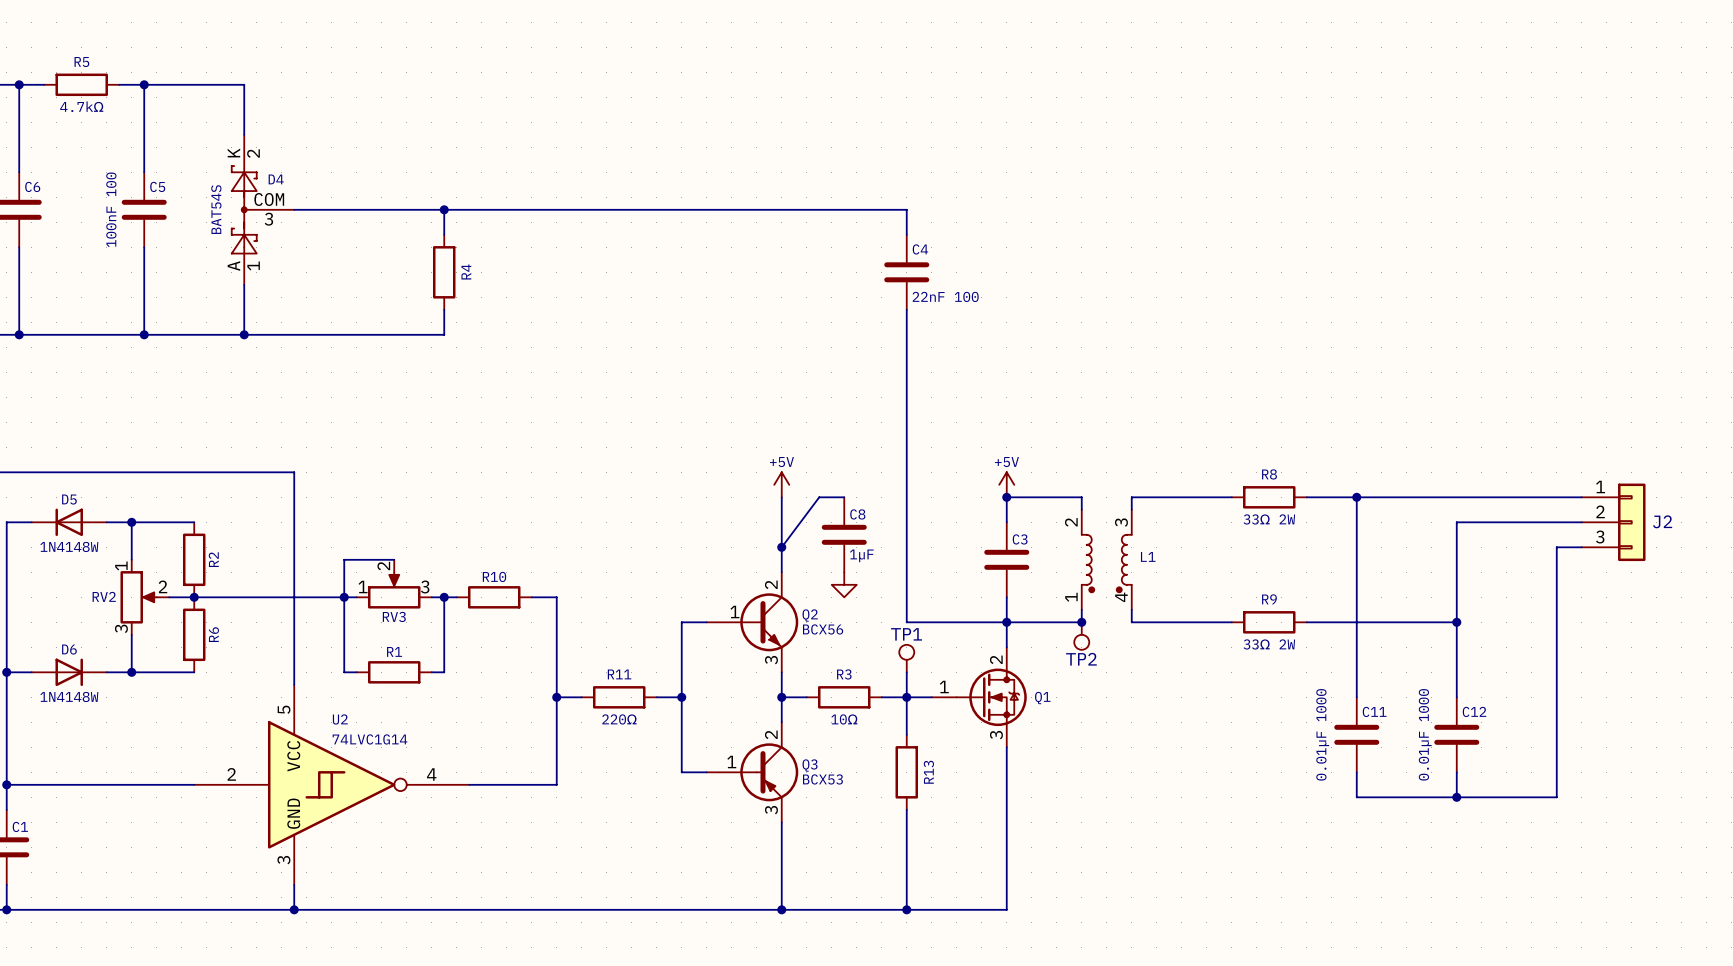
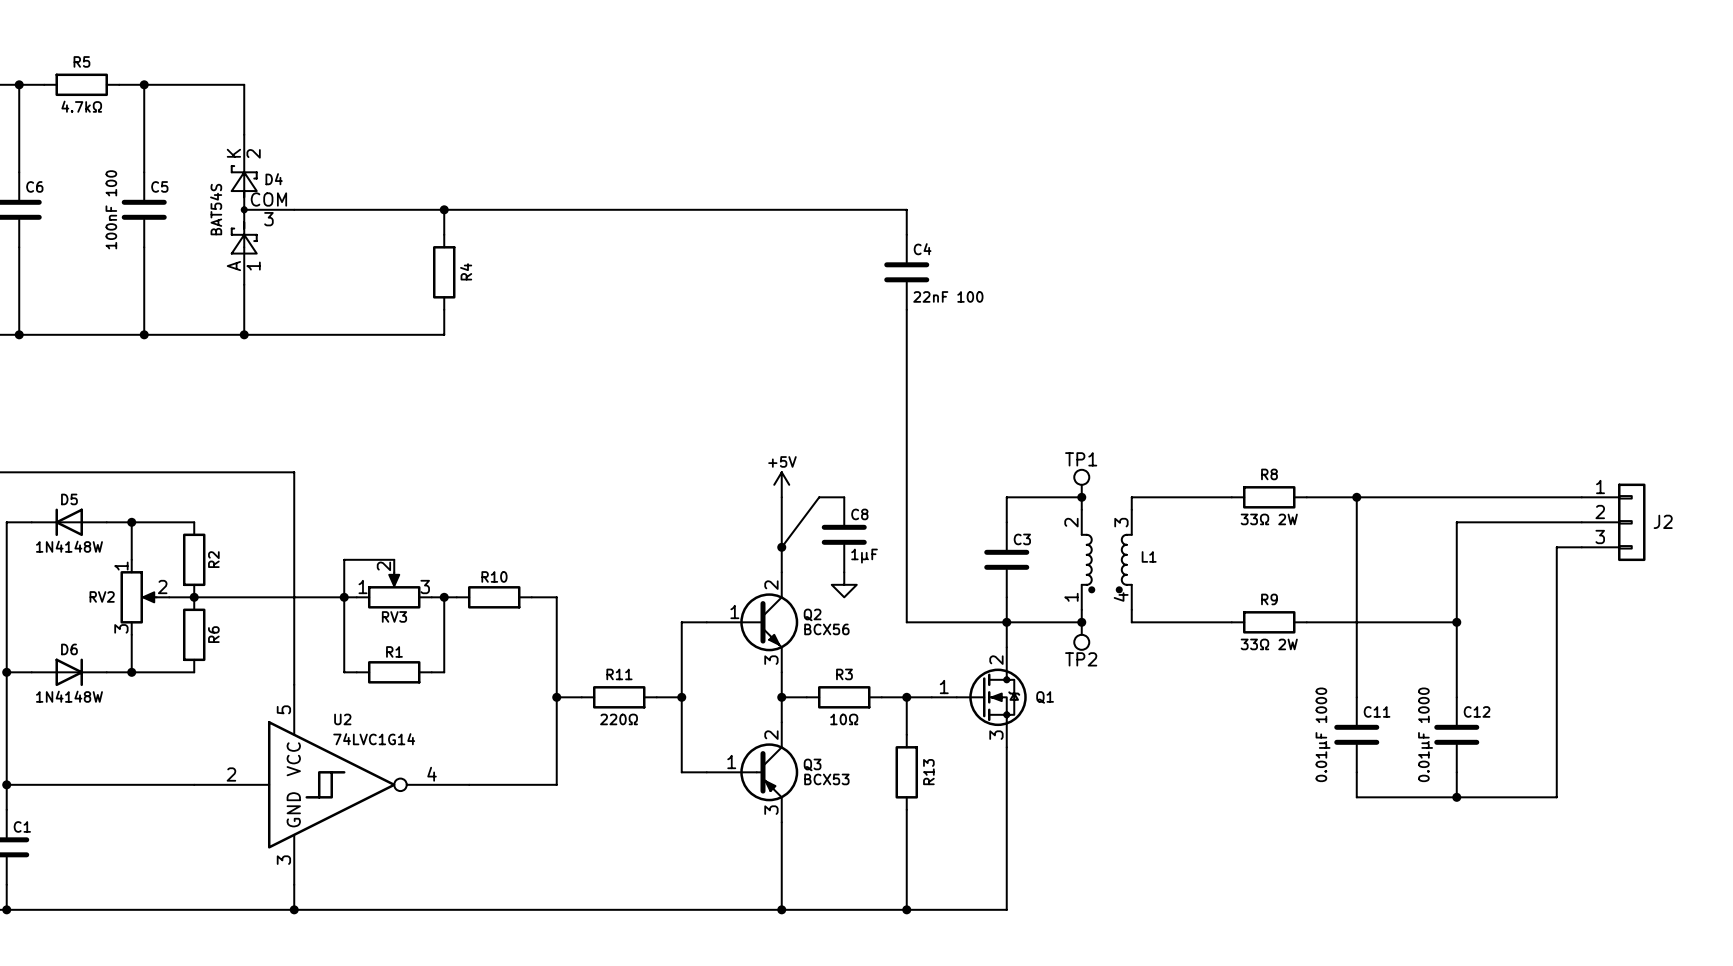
power symbol: +5V (1006, 484) -> none
junction: (1006, 497) -> none
junction: none -> (1081, 497)
TP1 position: (906, 658) -> (1081, 483)
wire: (906, 672) (906, 697) -> none

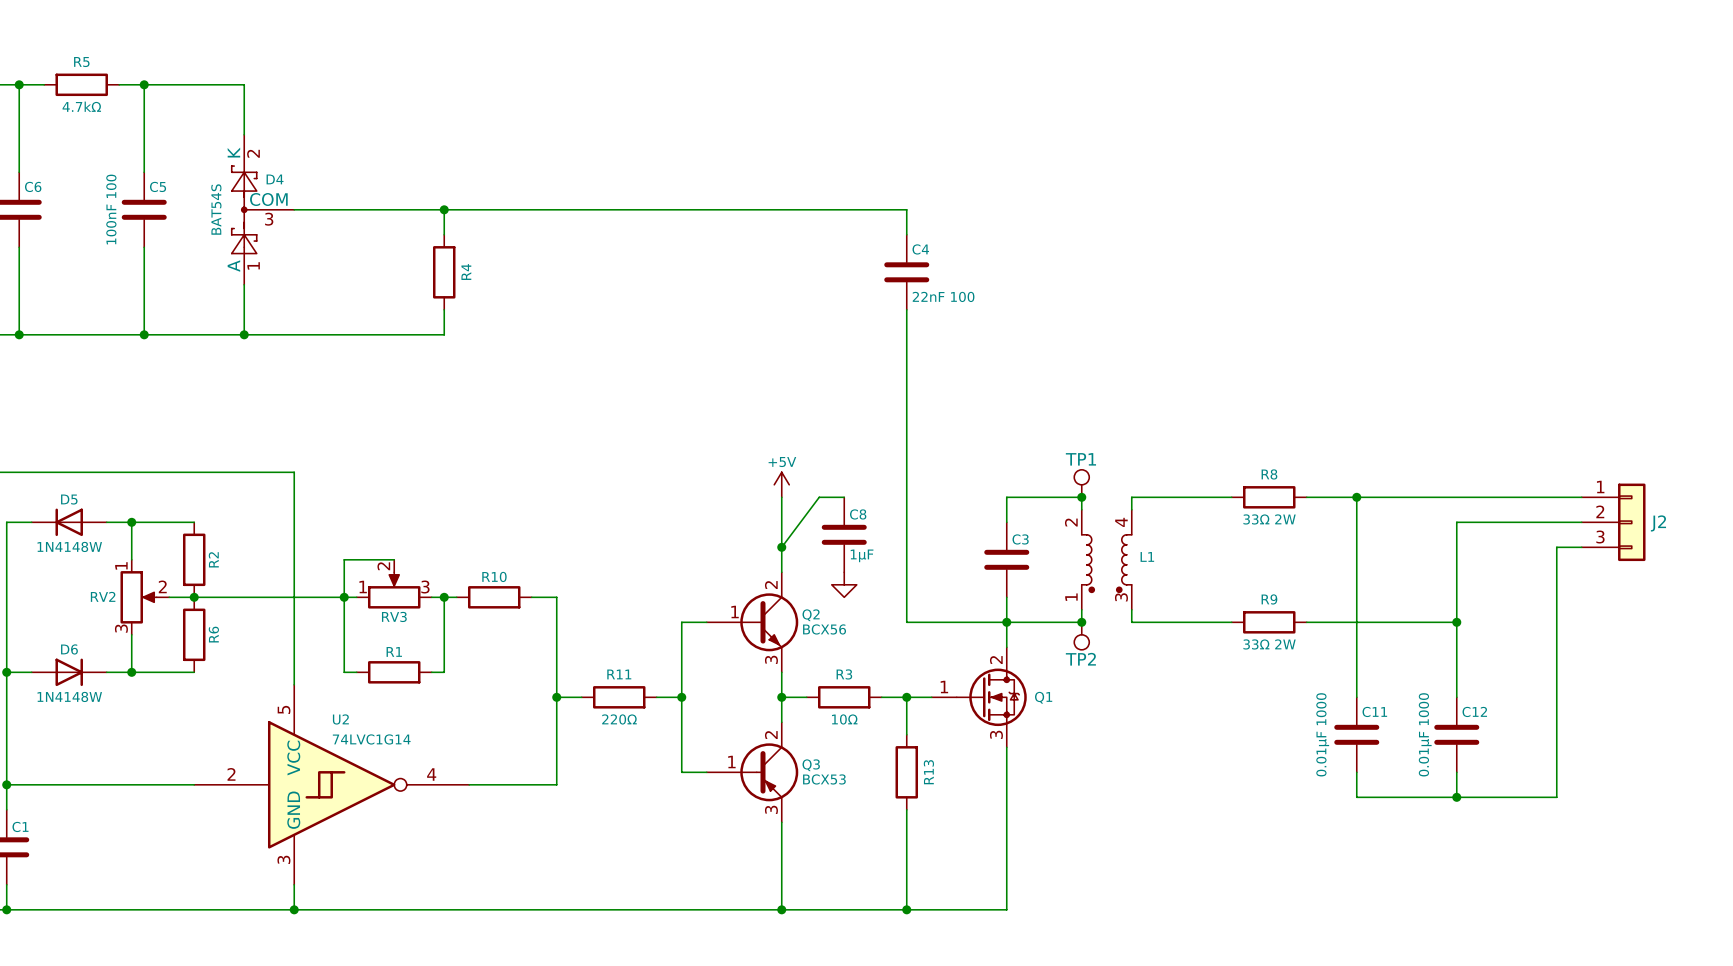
L1 pin number: 3 (1121, 522) -> 4 (1121, 522)
L1 pin number: 4 (1121, 597) -> 3 (1121, 597)

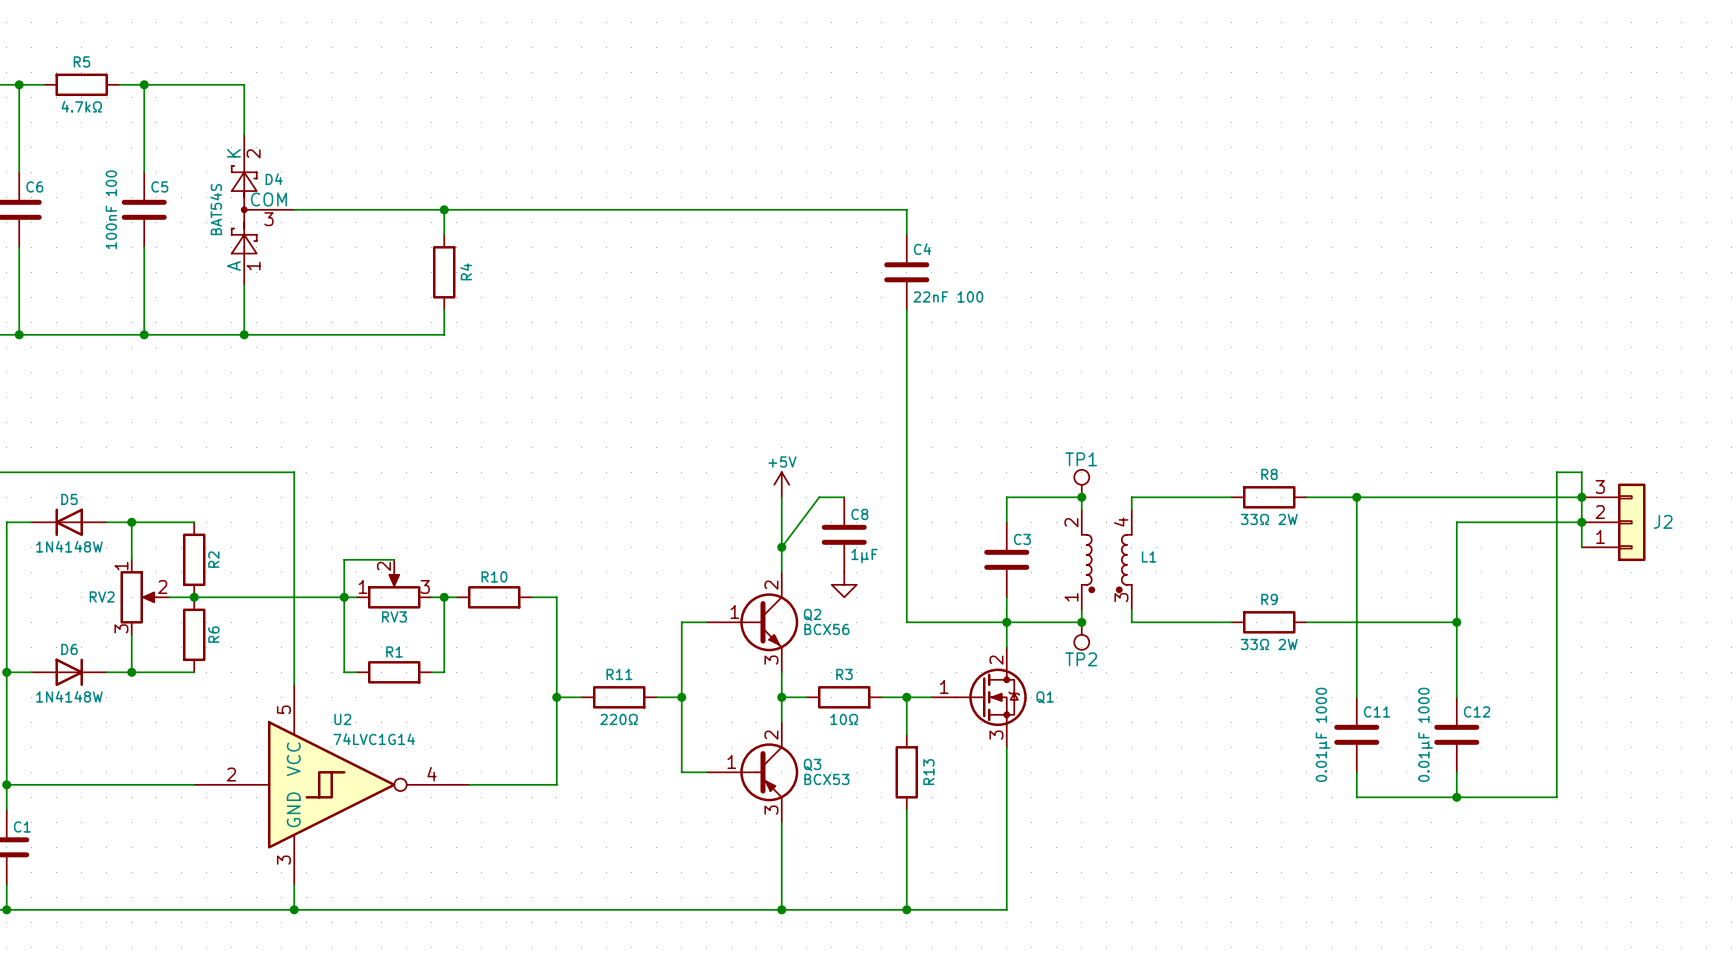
junction: none -> (1581, 497)
junction: none -> (1581, 522)
J2 flip: as is (1631, 522) -> up-down (1631, 522)
wire: (1556, 547) (1581, 547) -> (1556, 547) (1556, 472) (1581, 472) (1581, 547)

